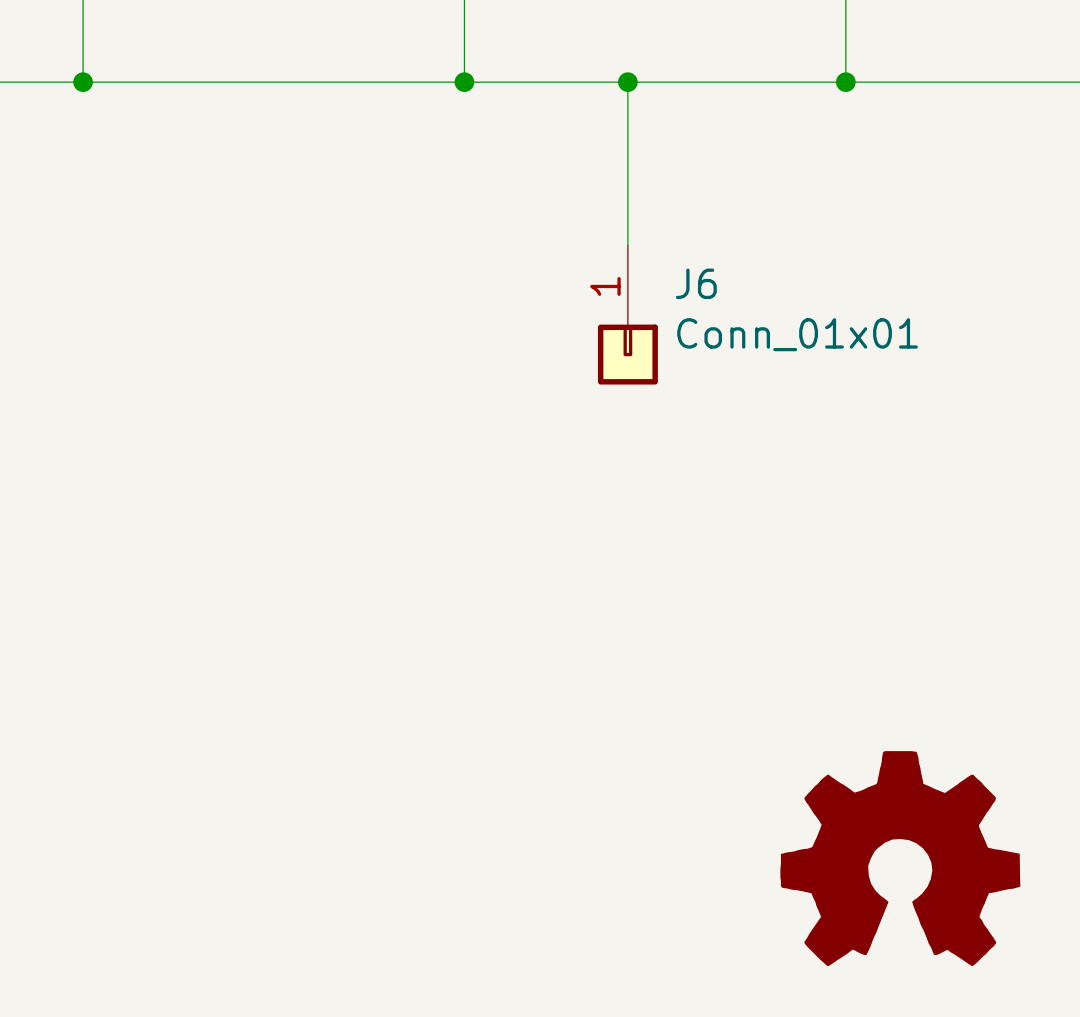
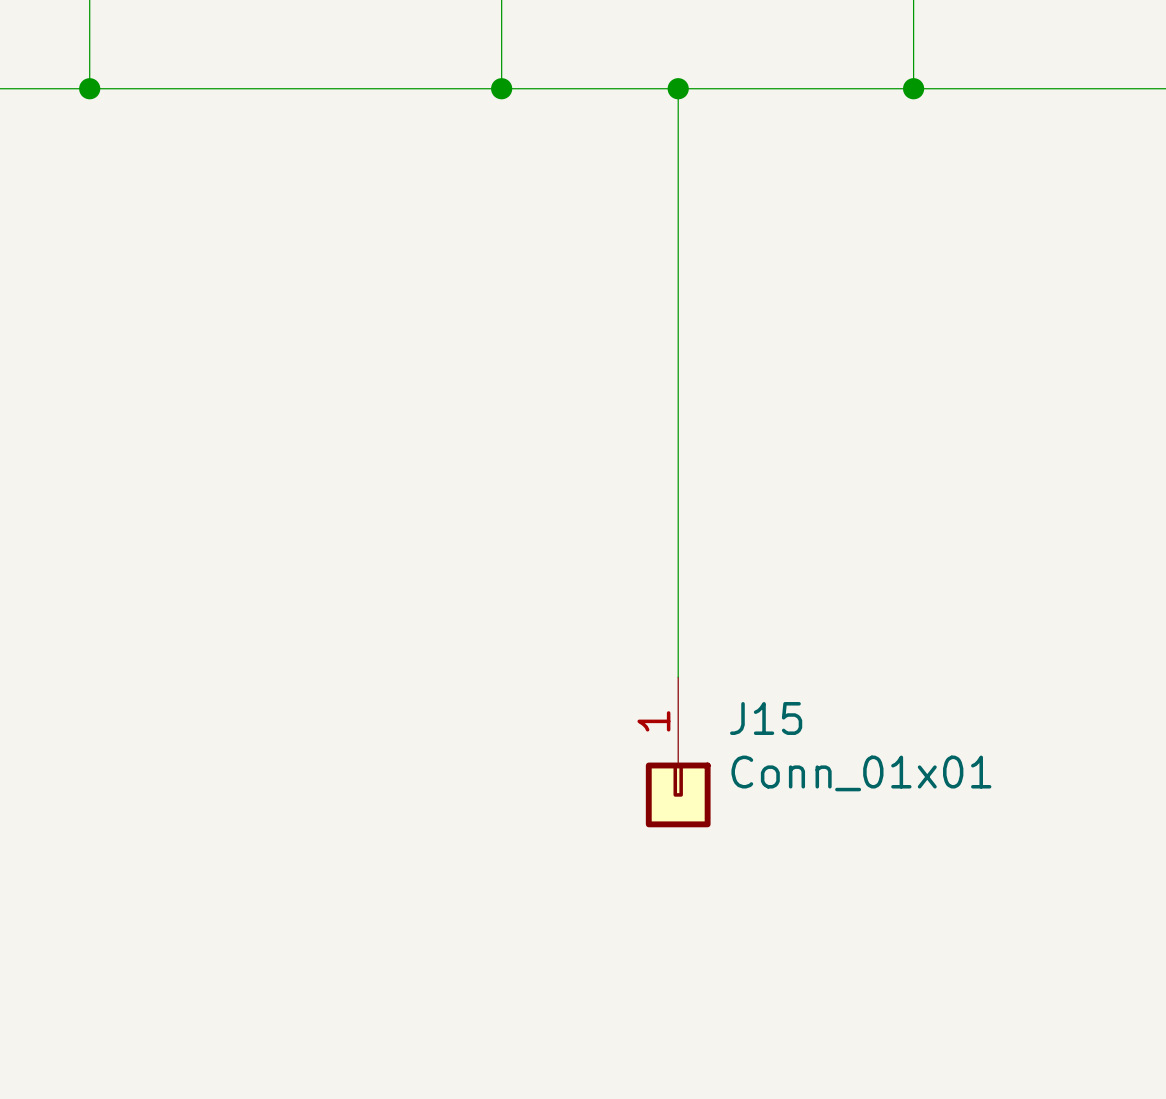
wire: none -> (678, 265) (678, 677)
J6: Conn_01x01 (627, 315) -> none
J15: none -> Conn_01x01 (678, 752)
part: (900, 858) -> none

